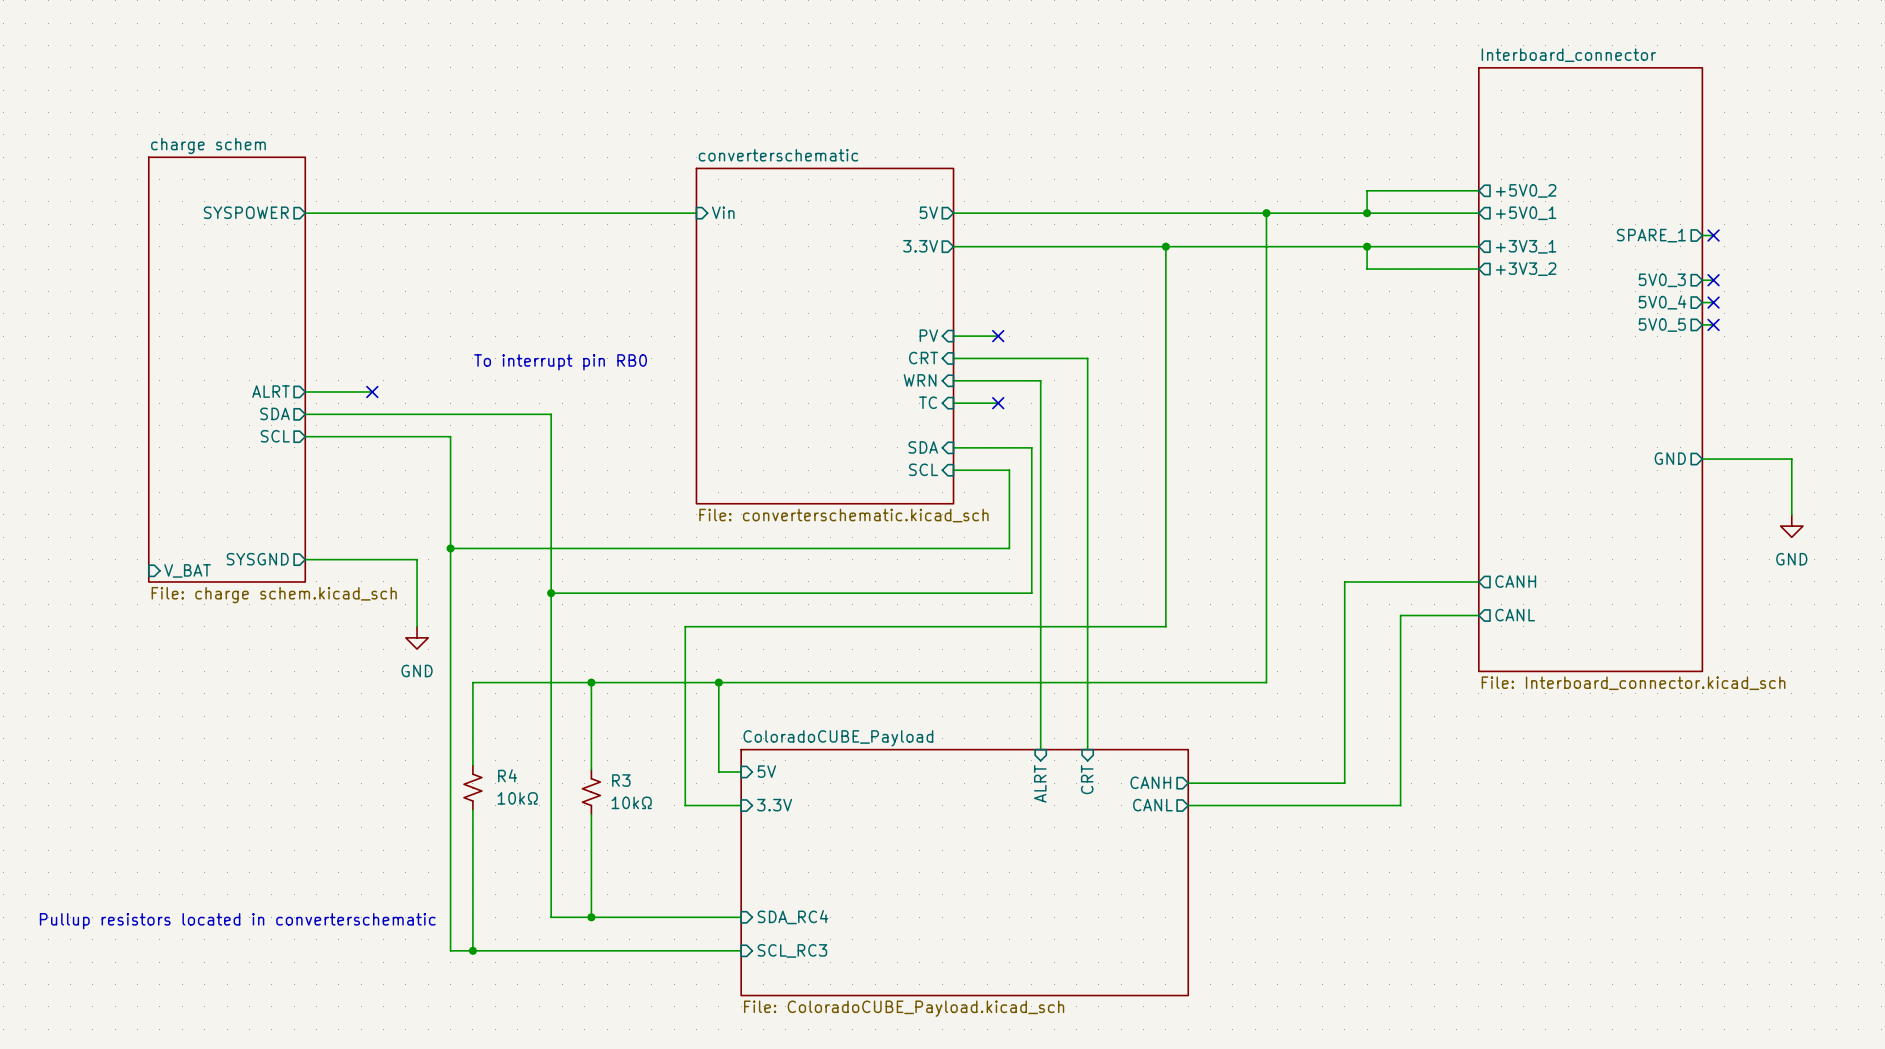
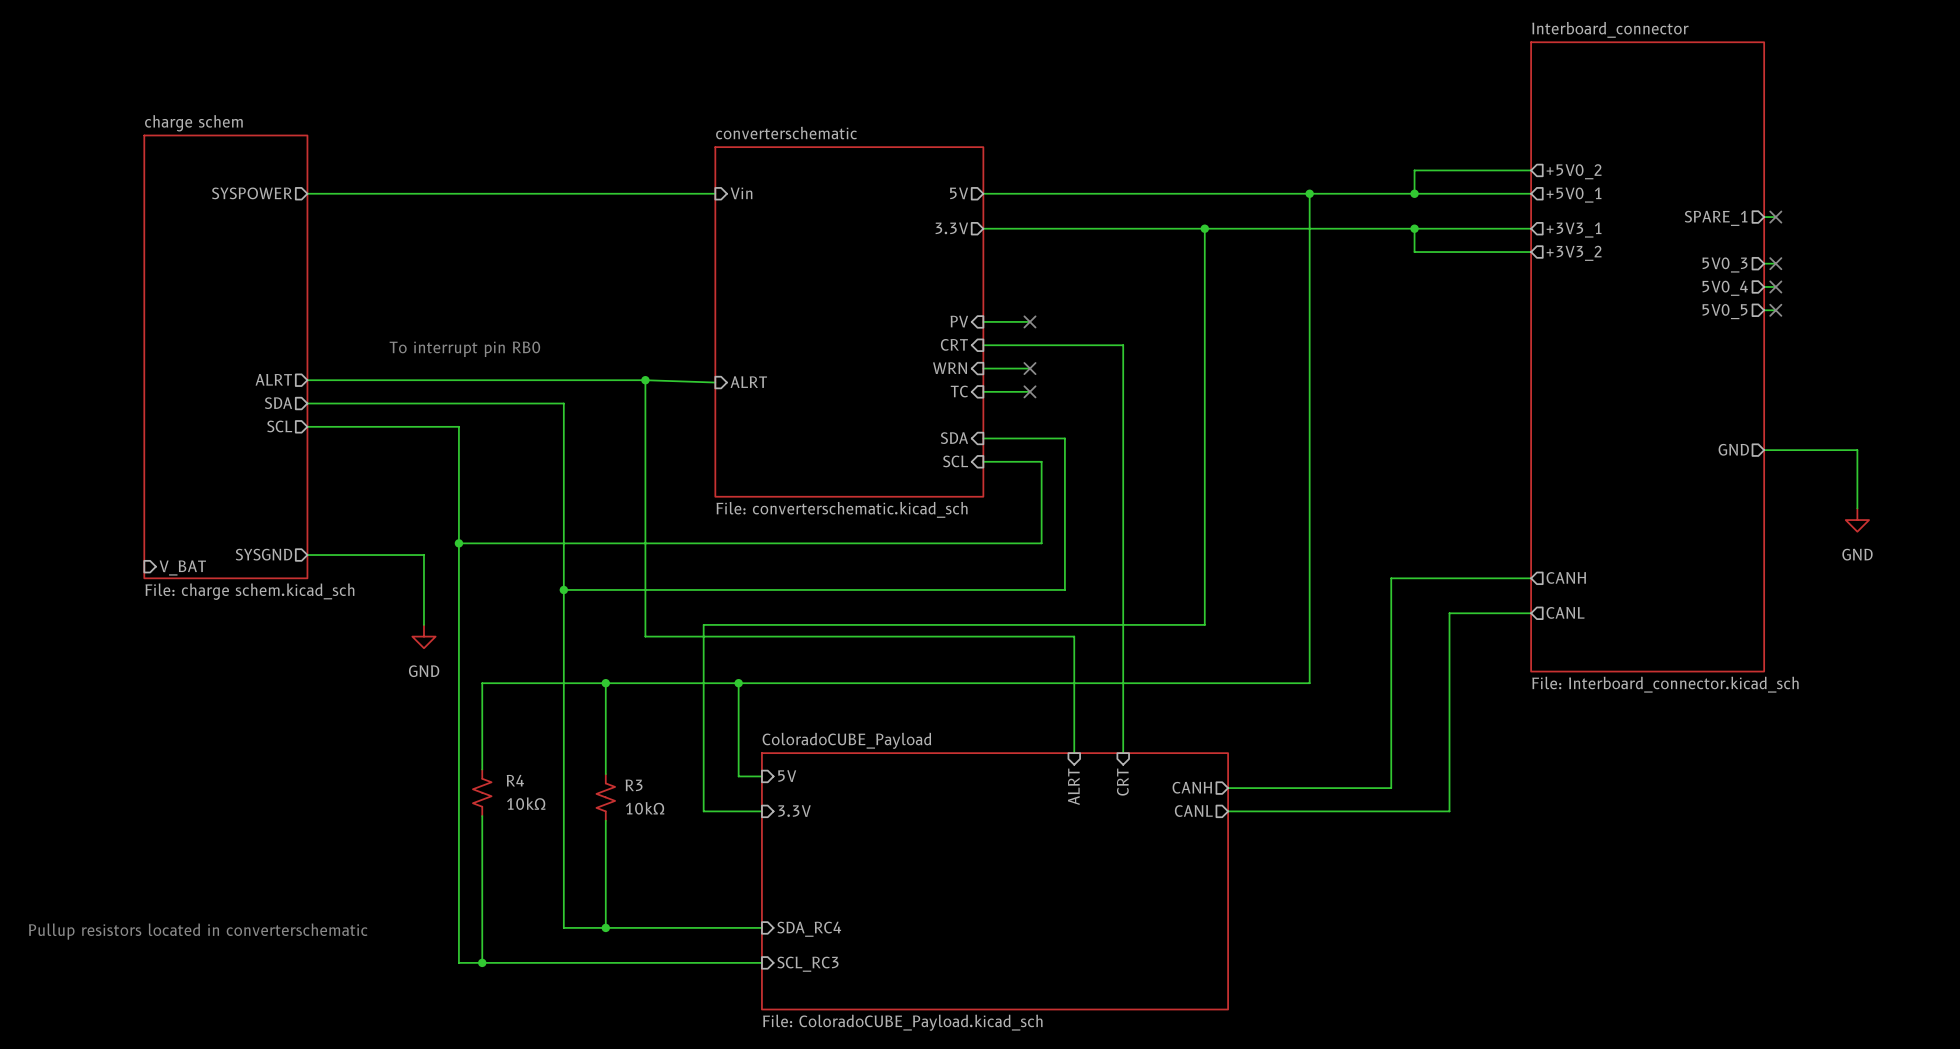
text position: To interrupt pin RB0 (560, 362) -> To interrupt pin RB0 (464, 349)
wire: (998, 380) (1040, 380) (1040, 637) -> (645, 380) (645, 636) (1074, 636)
no-connect mark: none -> (1029, 368)
wire: none -> (377, 380) (645, 380)
no-connect mark: (372, 391) -> none
wire: none -> (645, 380) (715, 382)
junction: none -> (645, 380)
sheet pin: none -> ALRT (748, 382)

